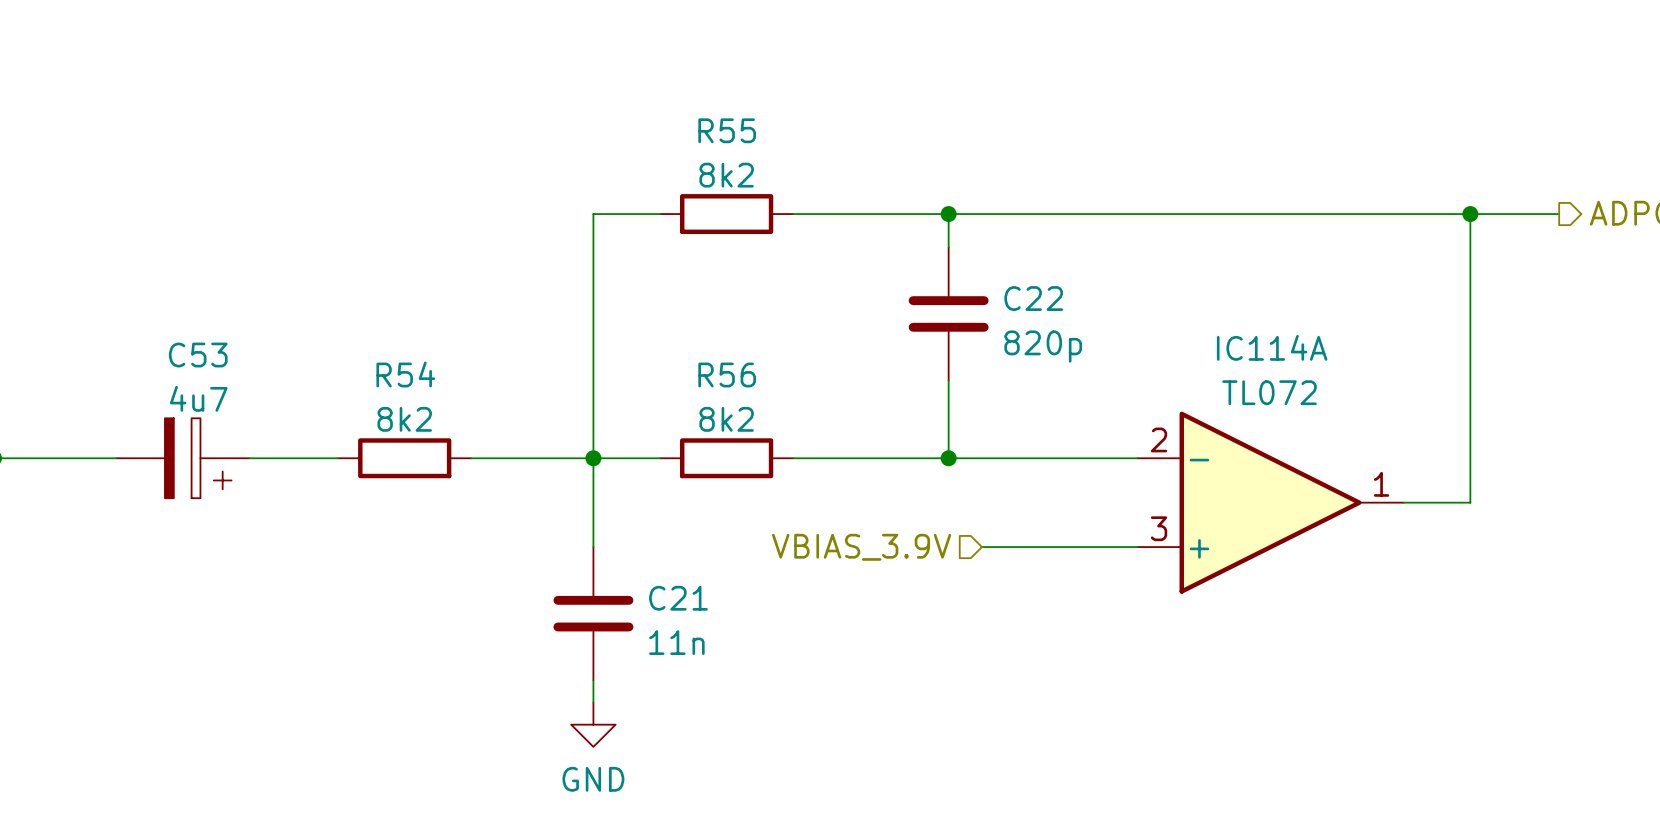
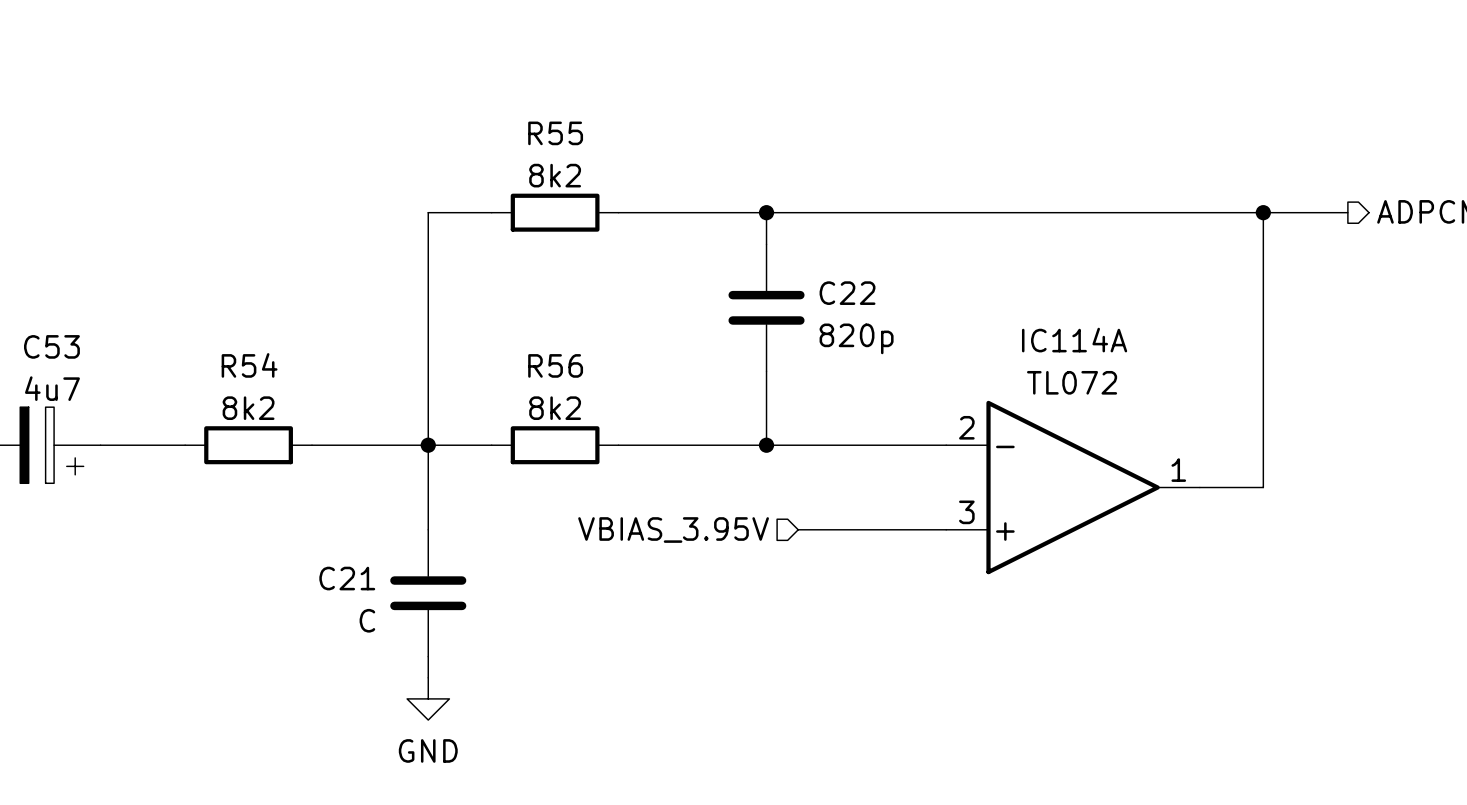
hierarchical label: VBIAS_3.9V (861, 547) -> VBIAS_3.95V (673, 530)
C21 name position: C21 (678, 598) -> C21 (347, 578)
C21 value: 11n (676, 642) -> C (367, 620)

